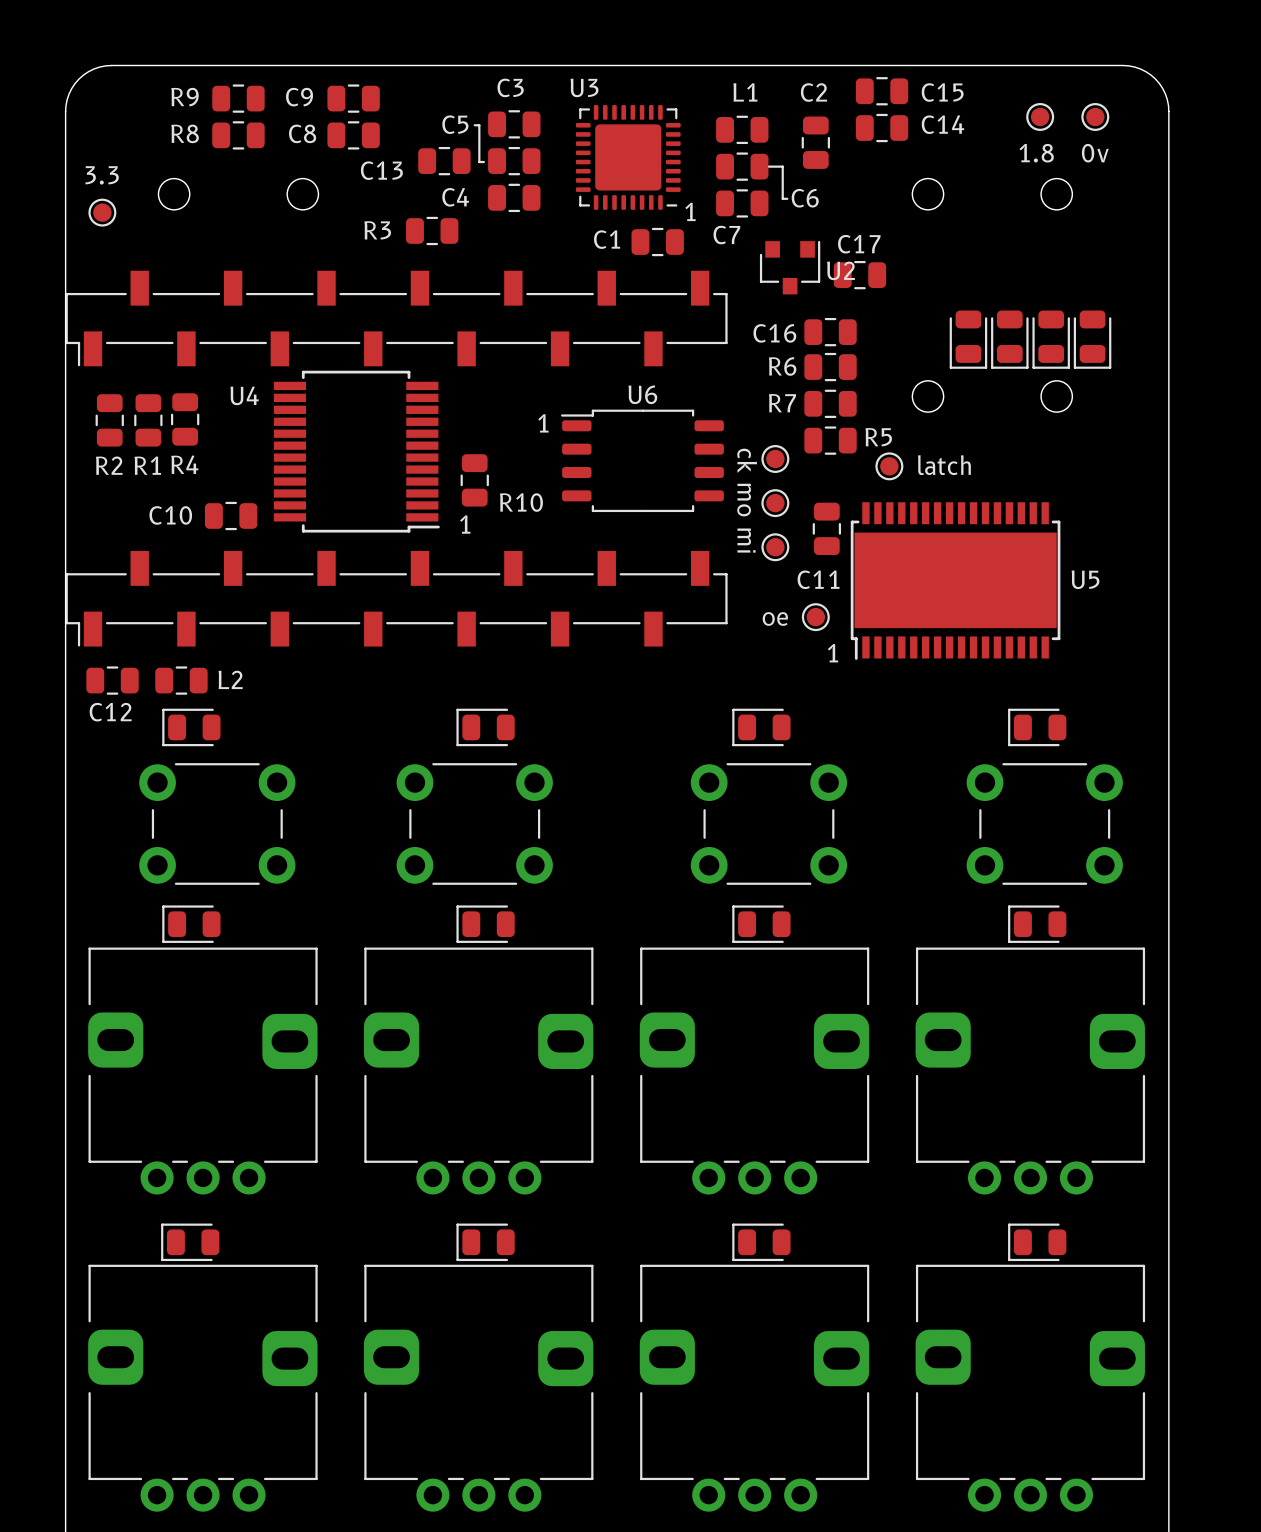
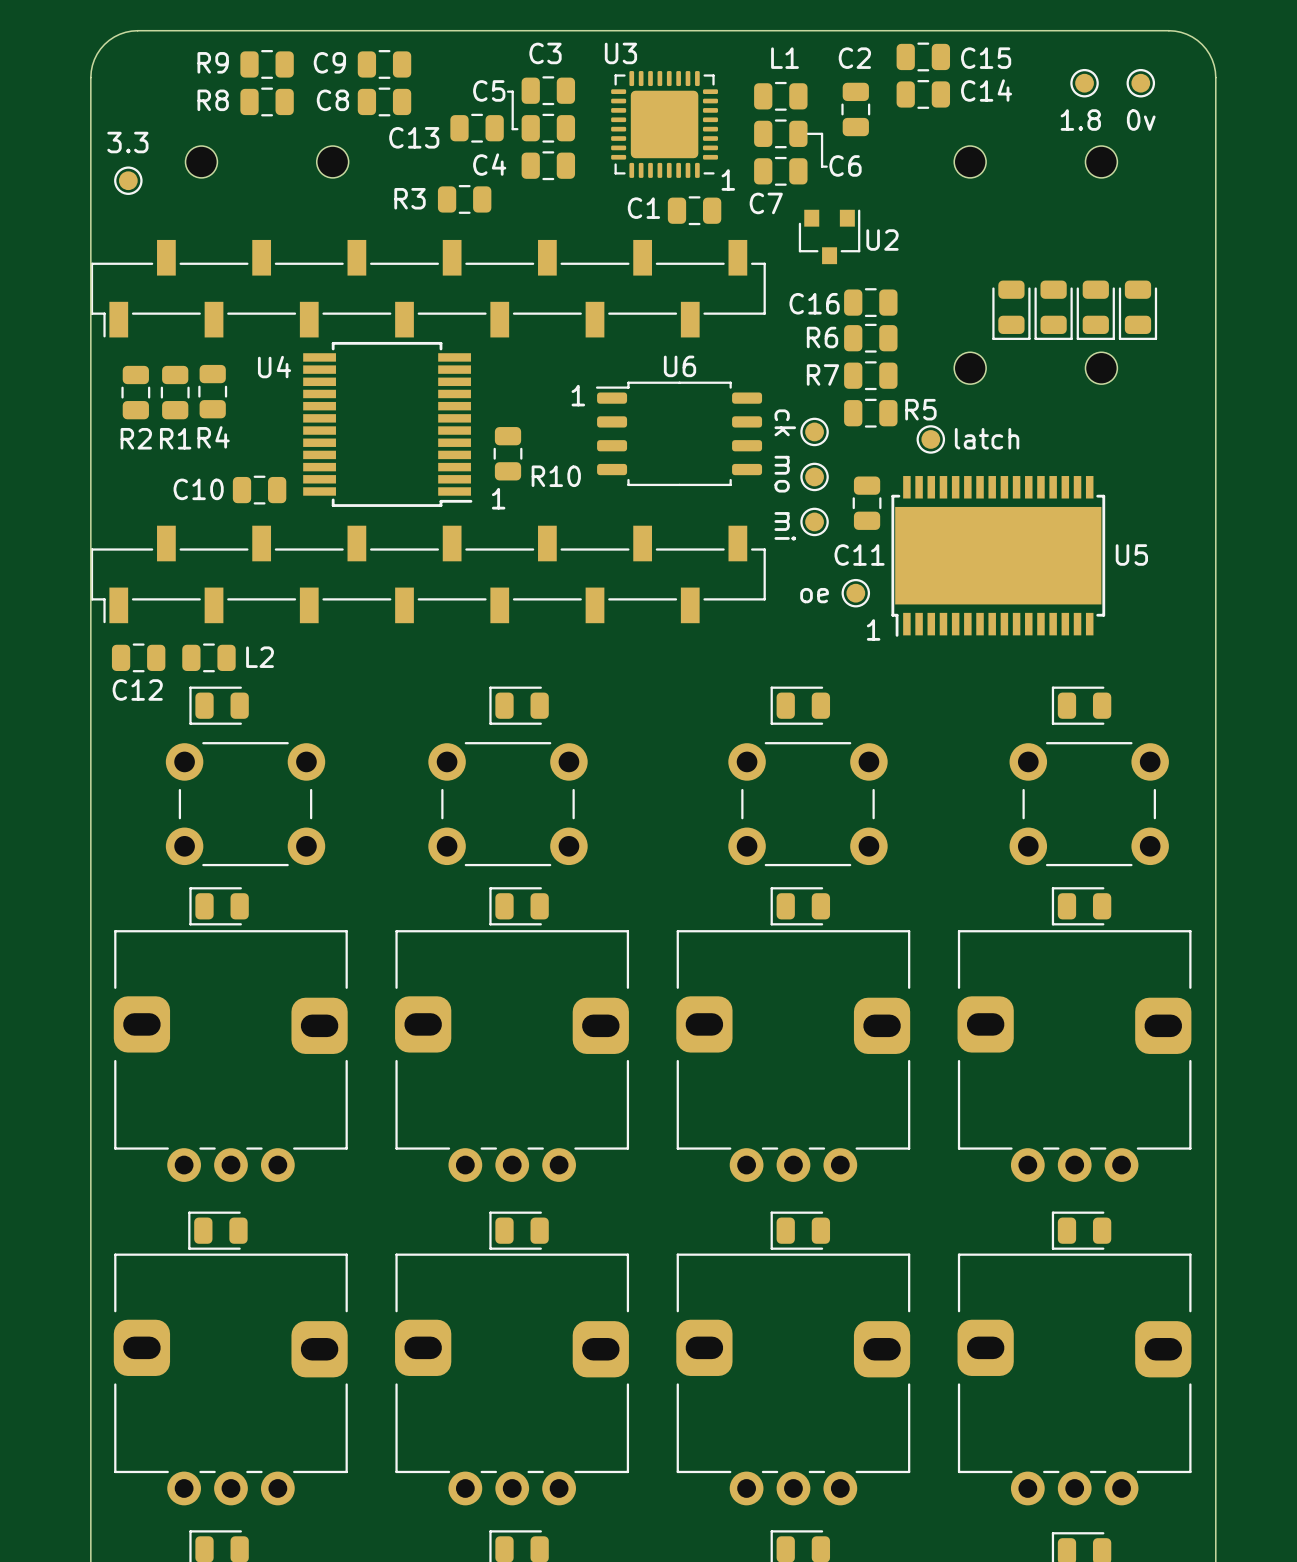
C17: (859, 275) -> none

